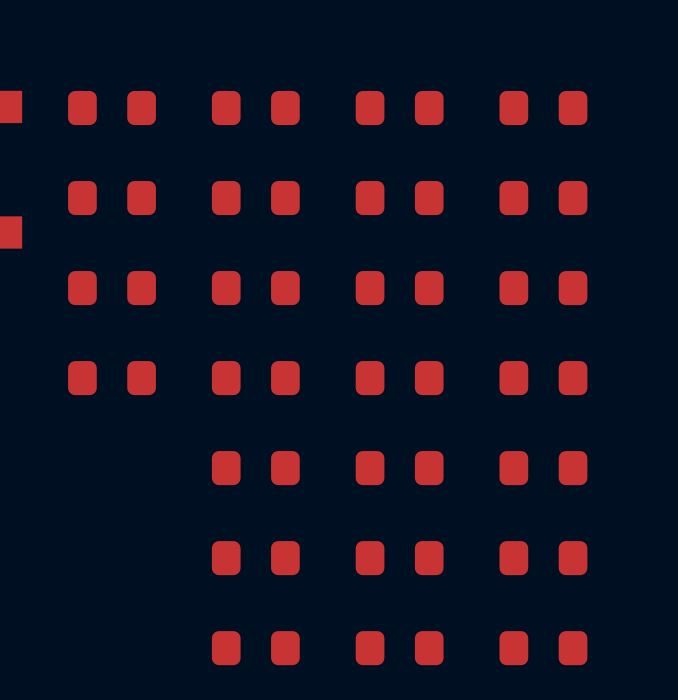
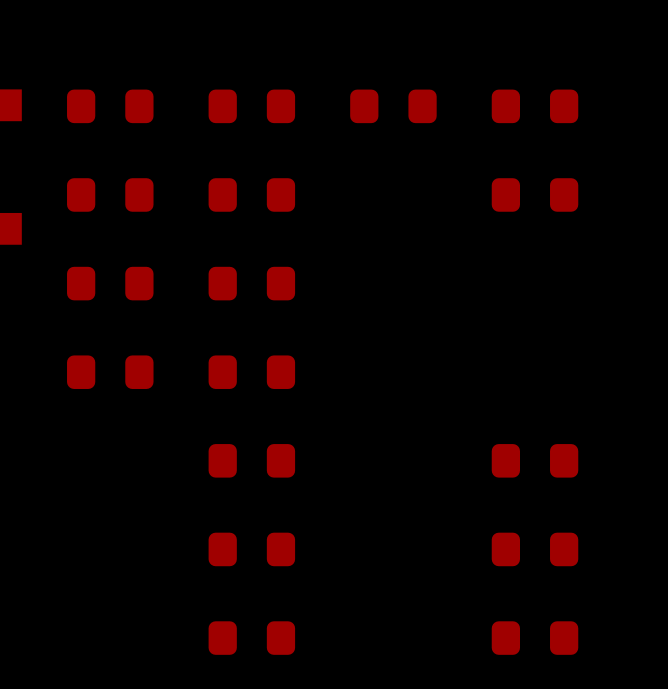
part: (399, 198) -> none
part: (399, 288) -> none
part: (543, 288) -> none
part: (399, 378) -> none
part: (543, 378) -> none
part: (399, 468) -> none
part: (399, 558) -> none
part: (399, 648) -> none

